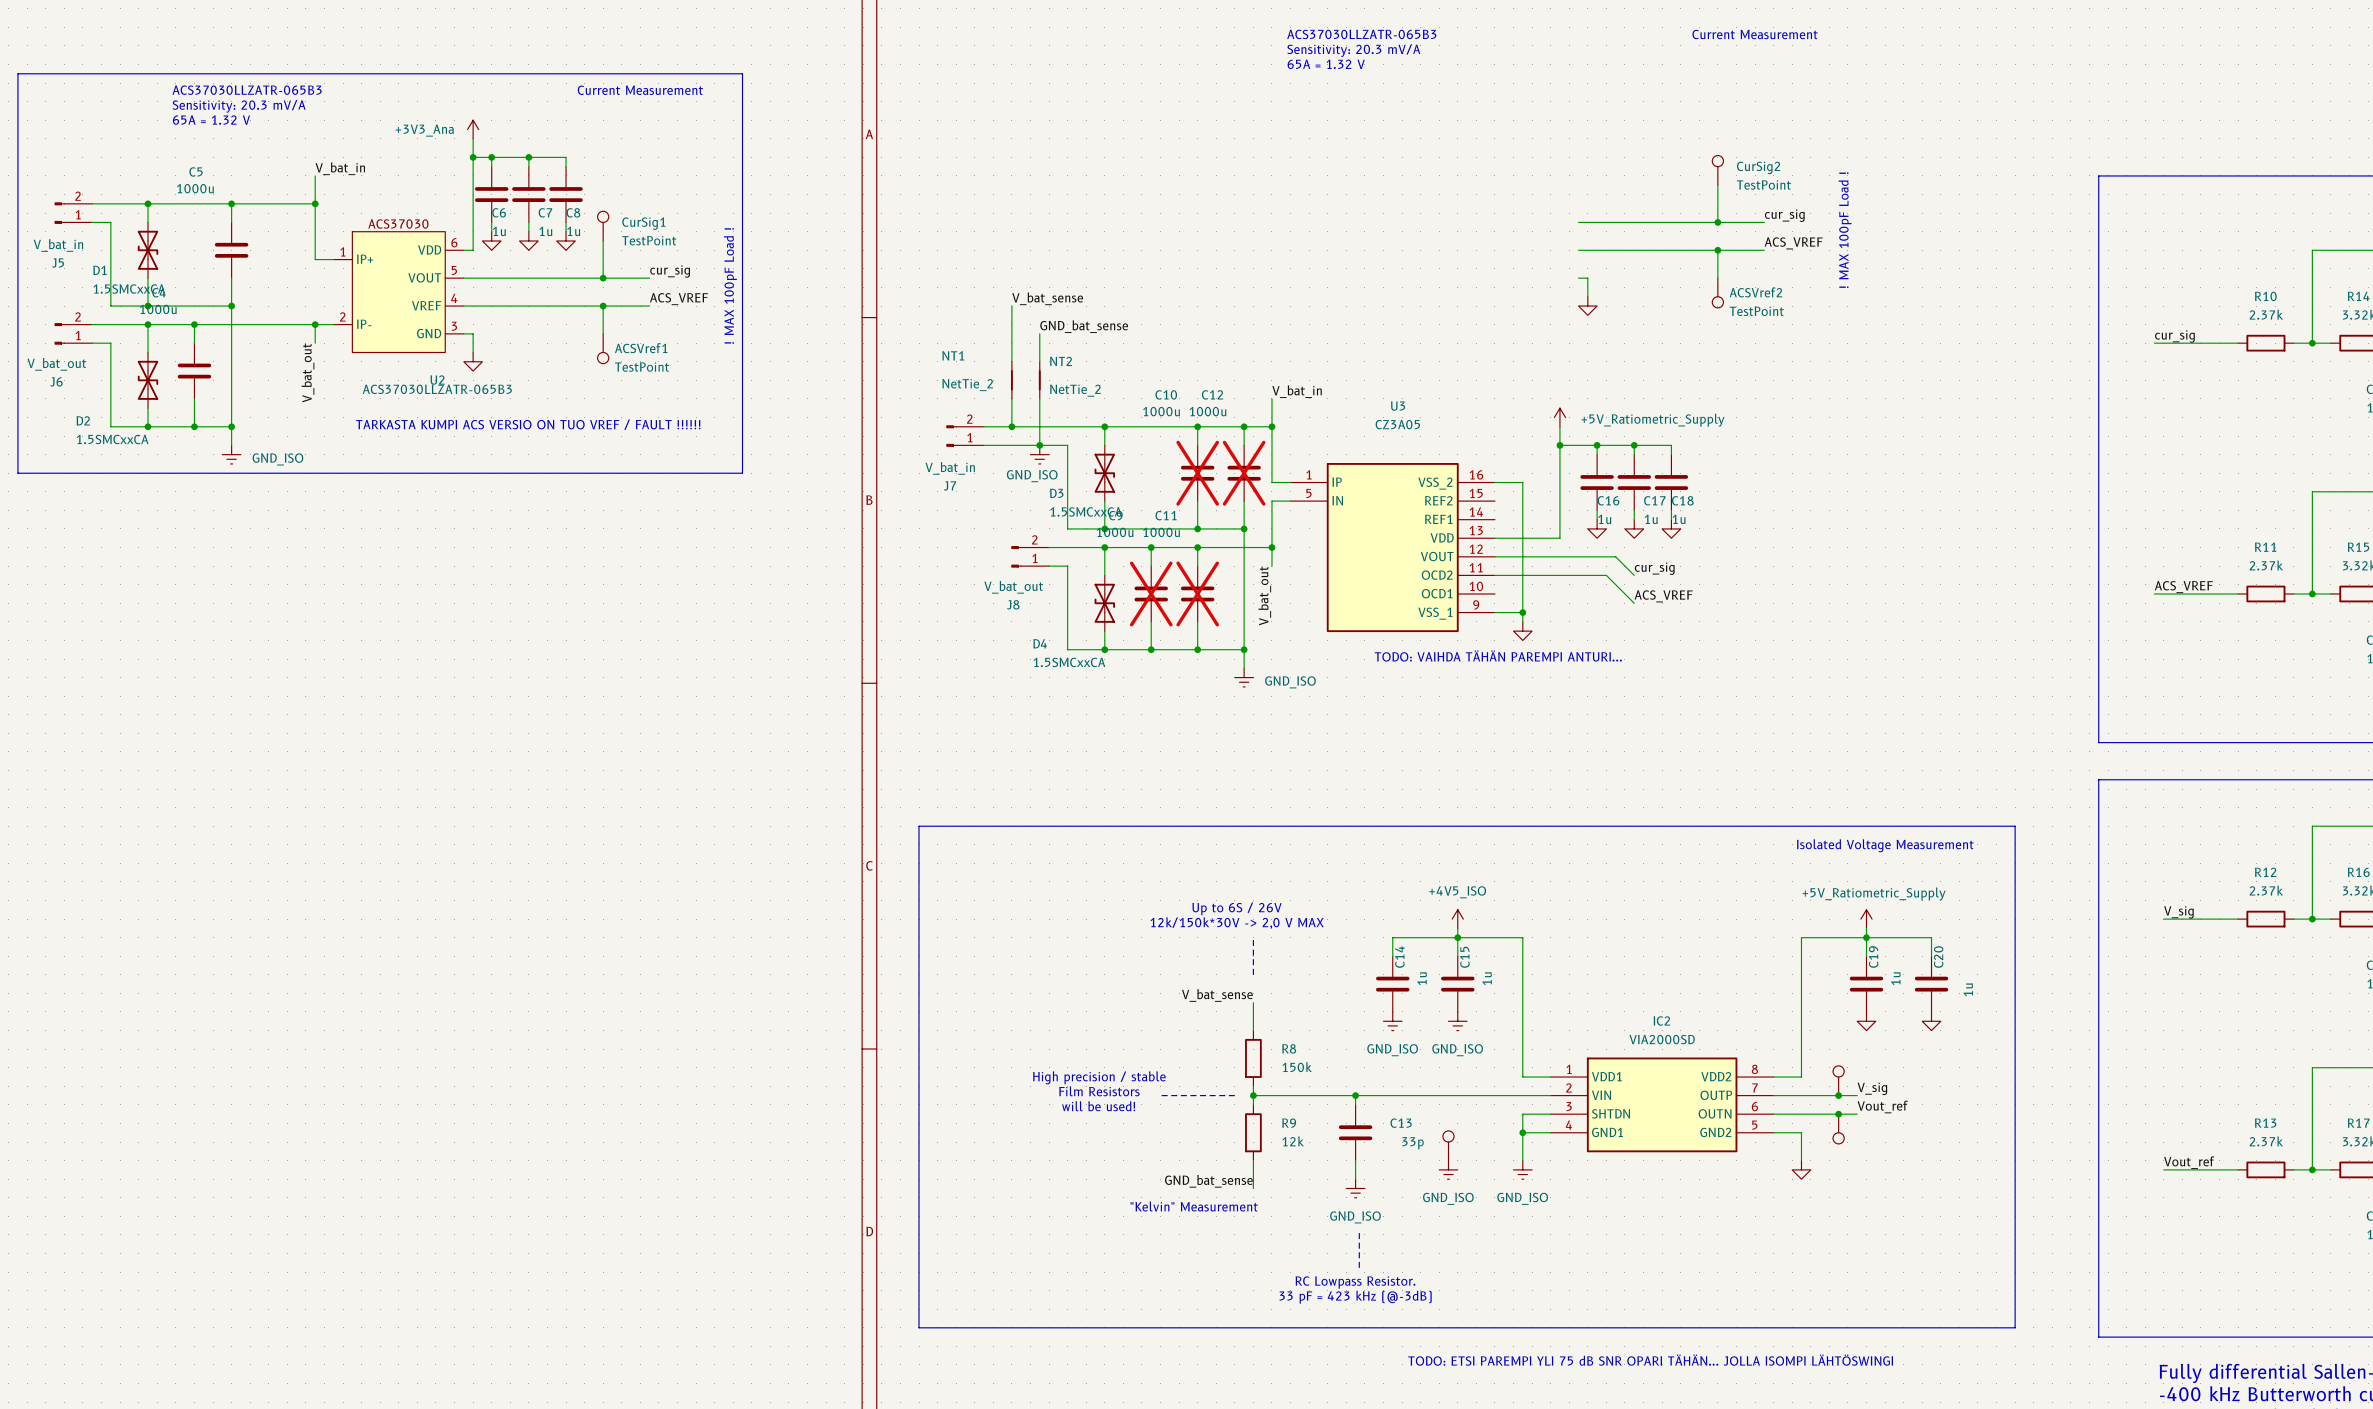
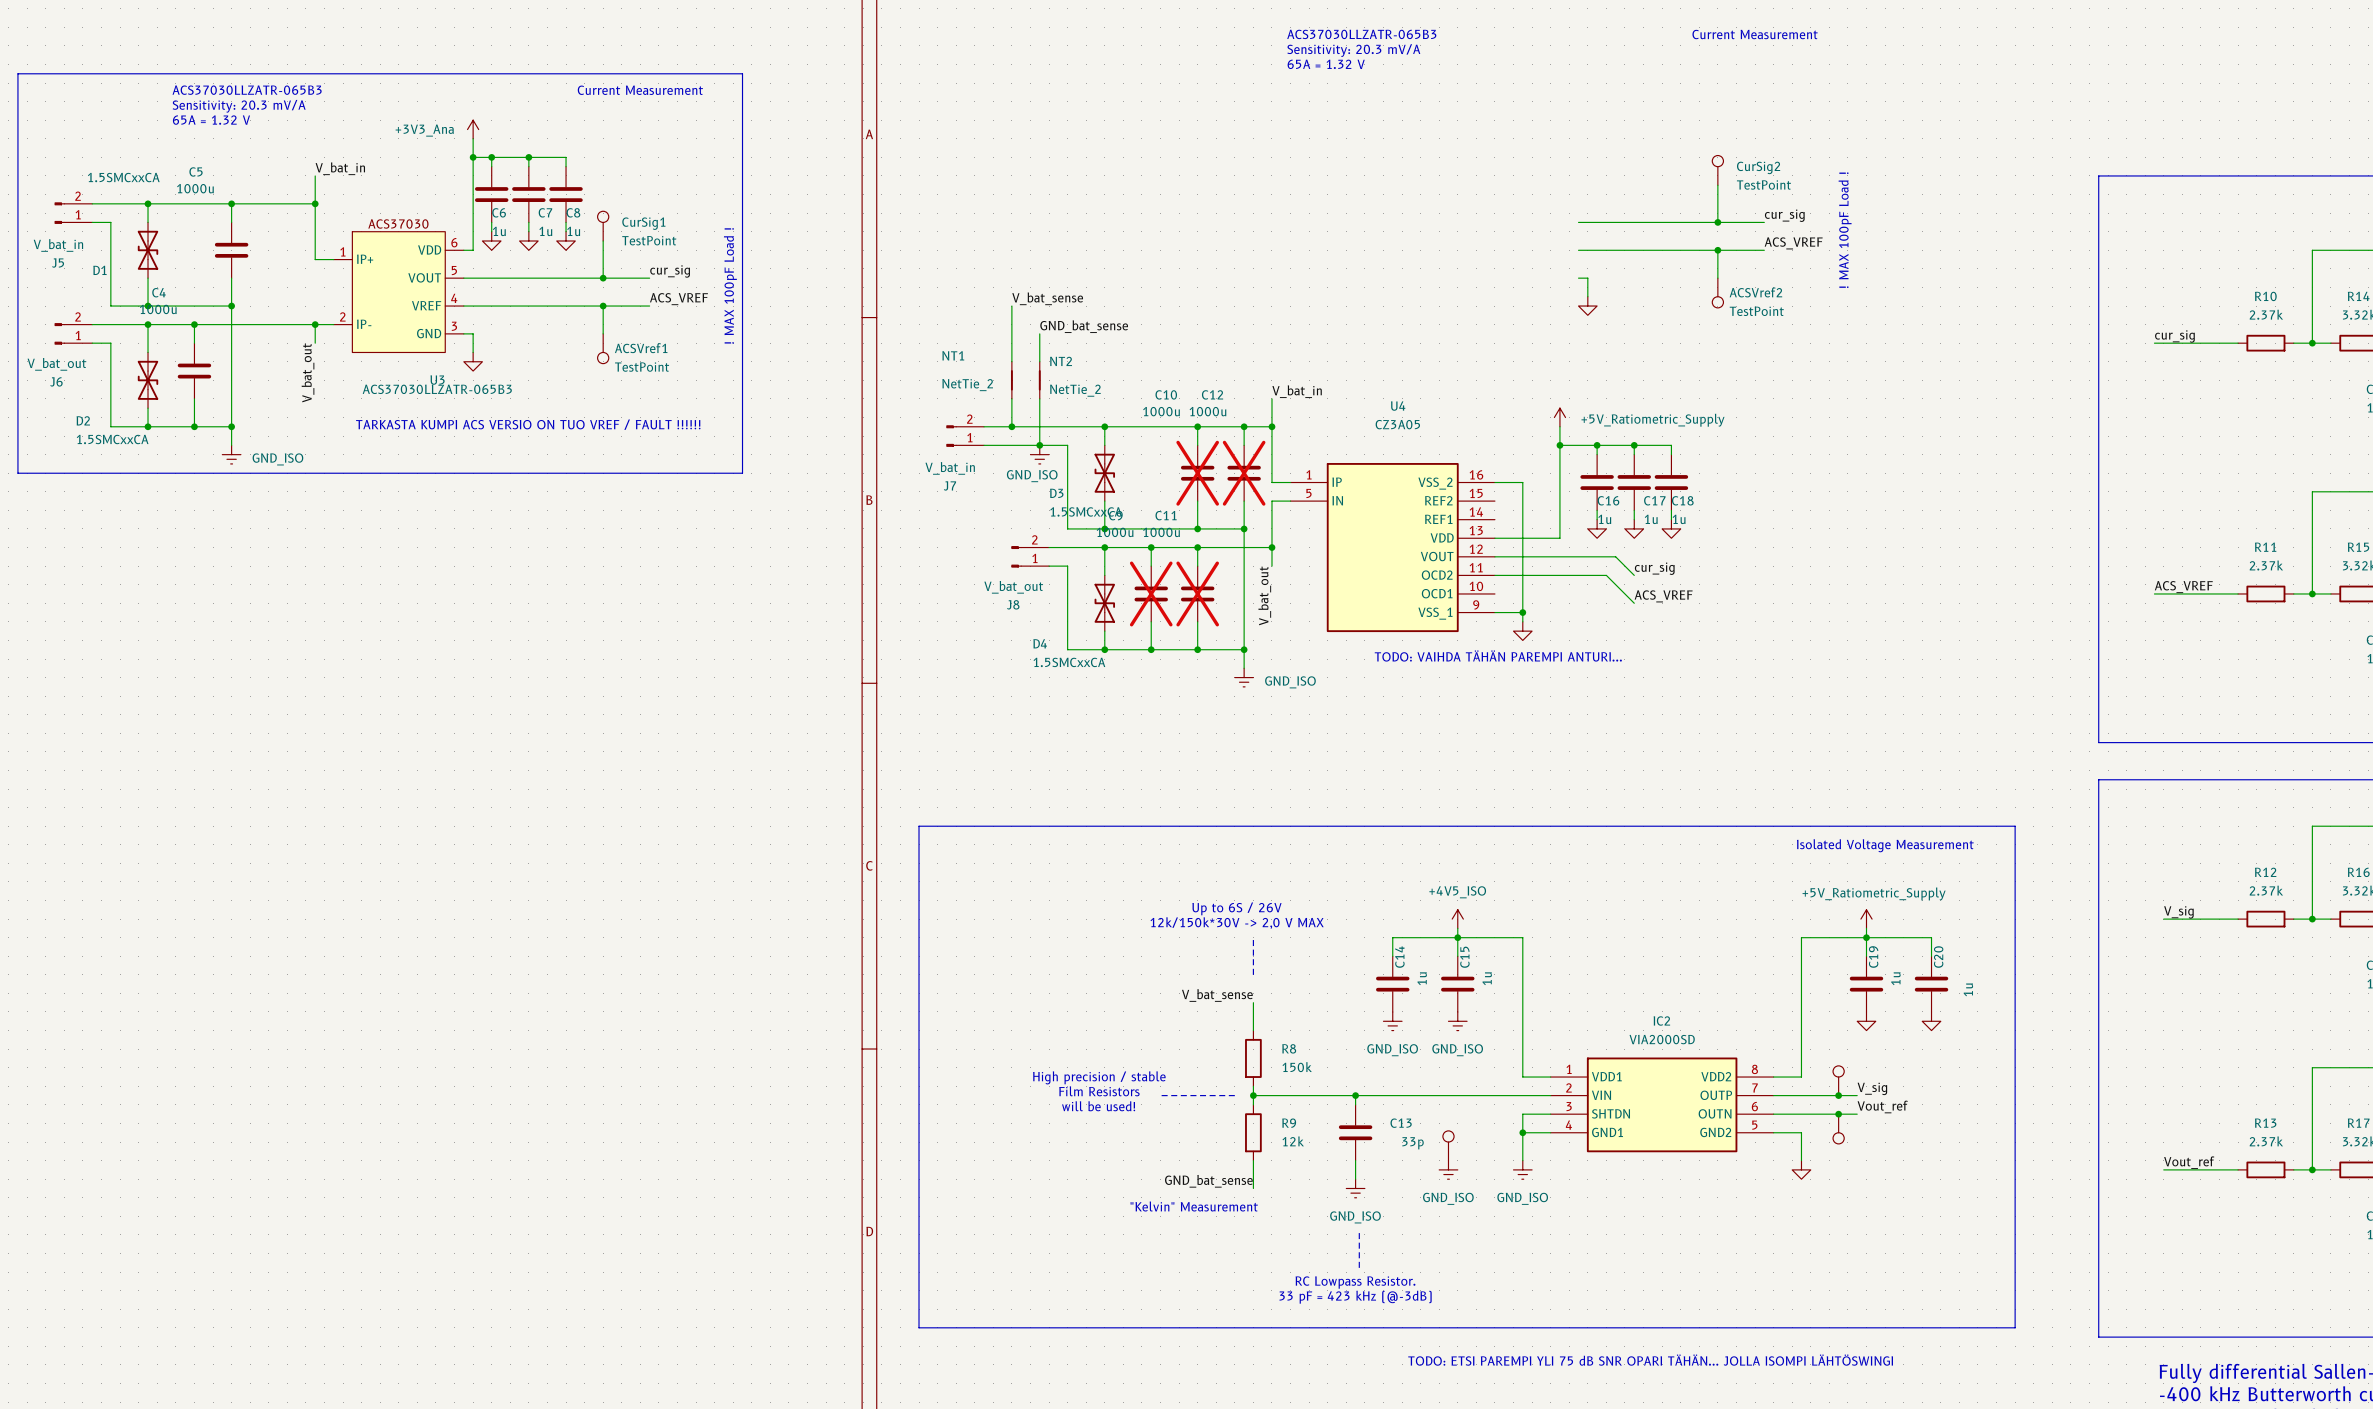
D1 value position: 1.5SMCxxCA (129, 289) -> 1.5SMCxxCA (123, 177)
U2 name: U2 (437, 380) -> U3 (437, 380)
U3 name: U3 (1398, 406) -> U4 (1398, 406)

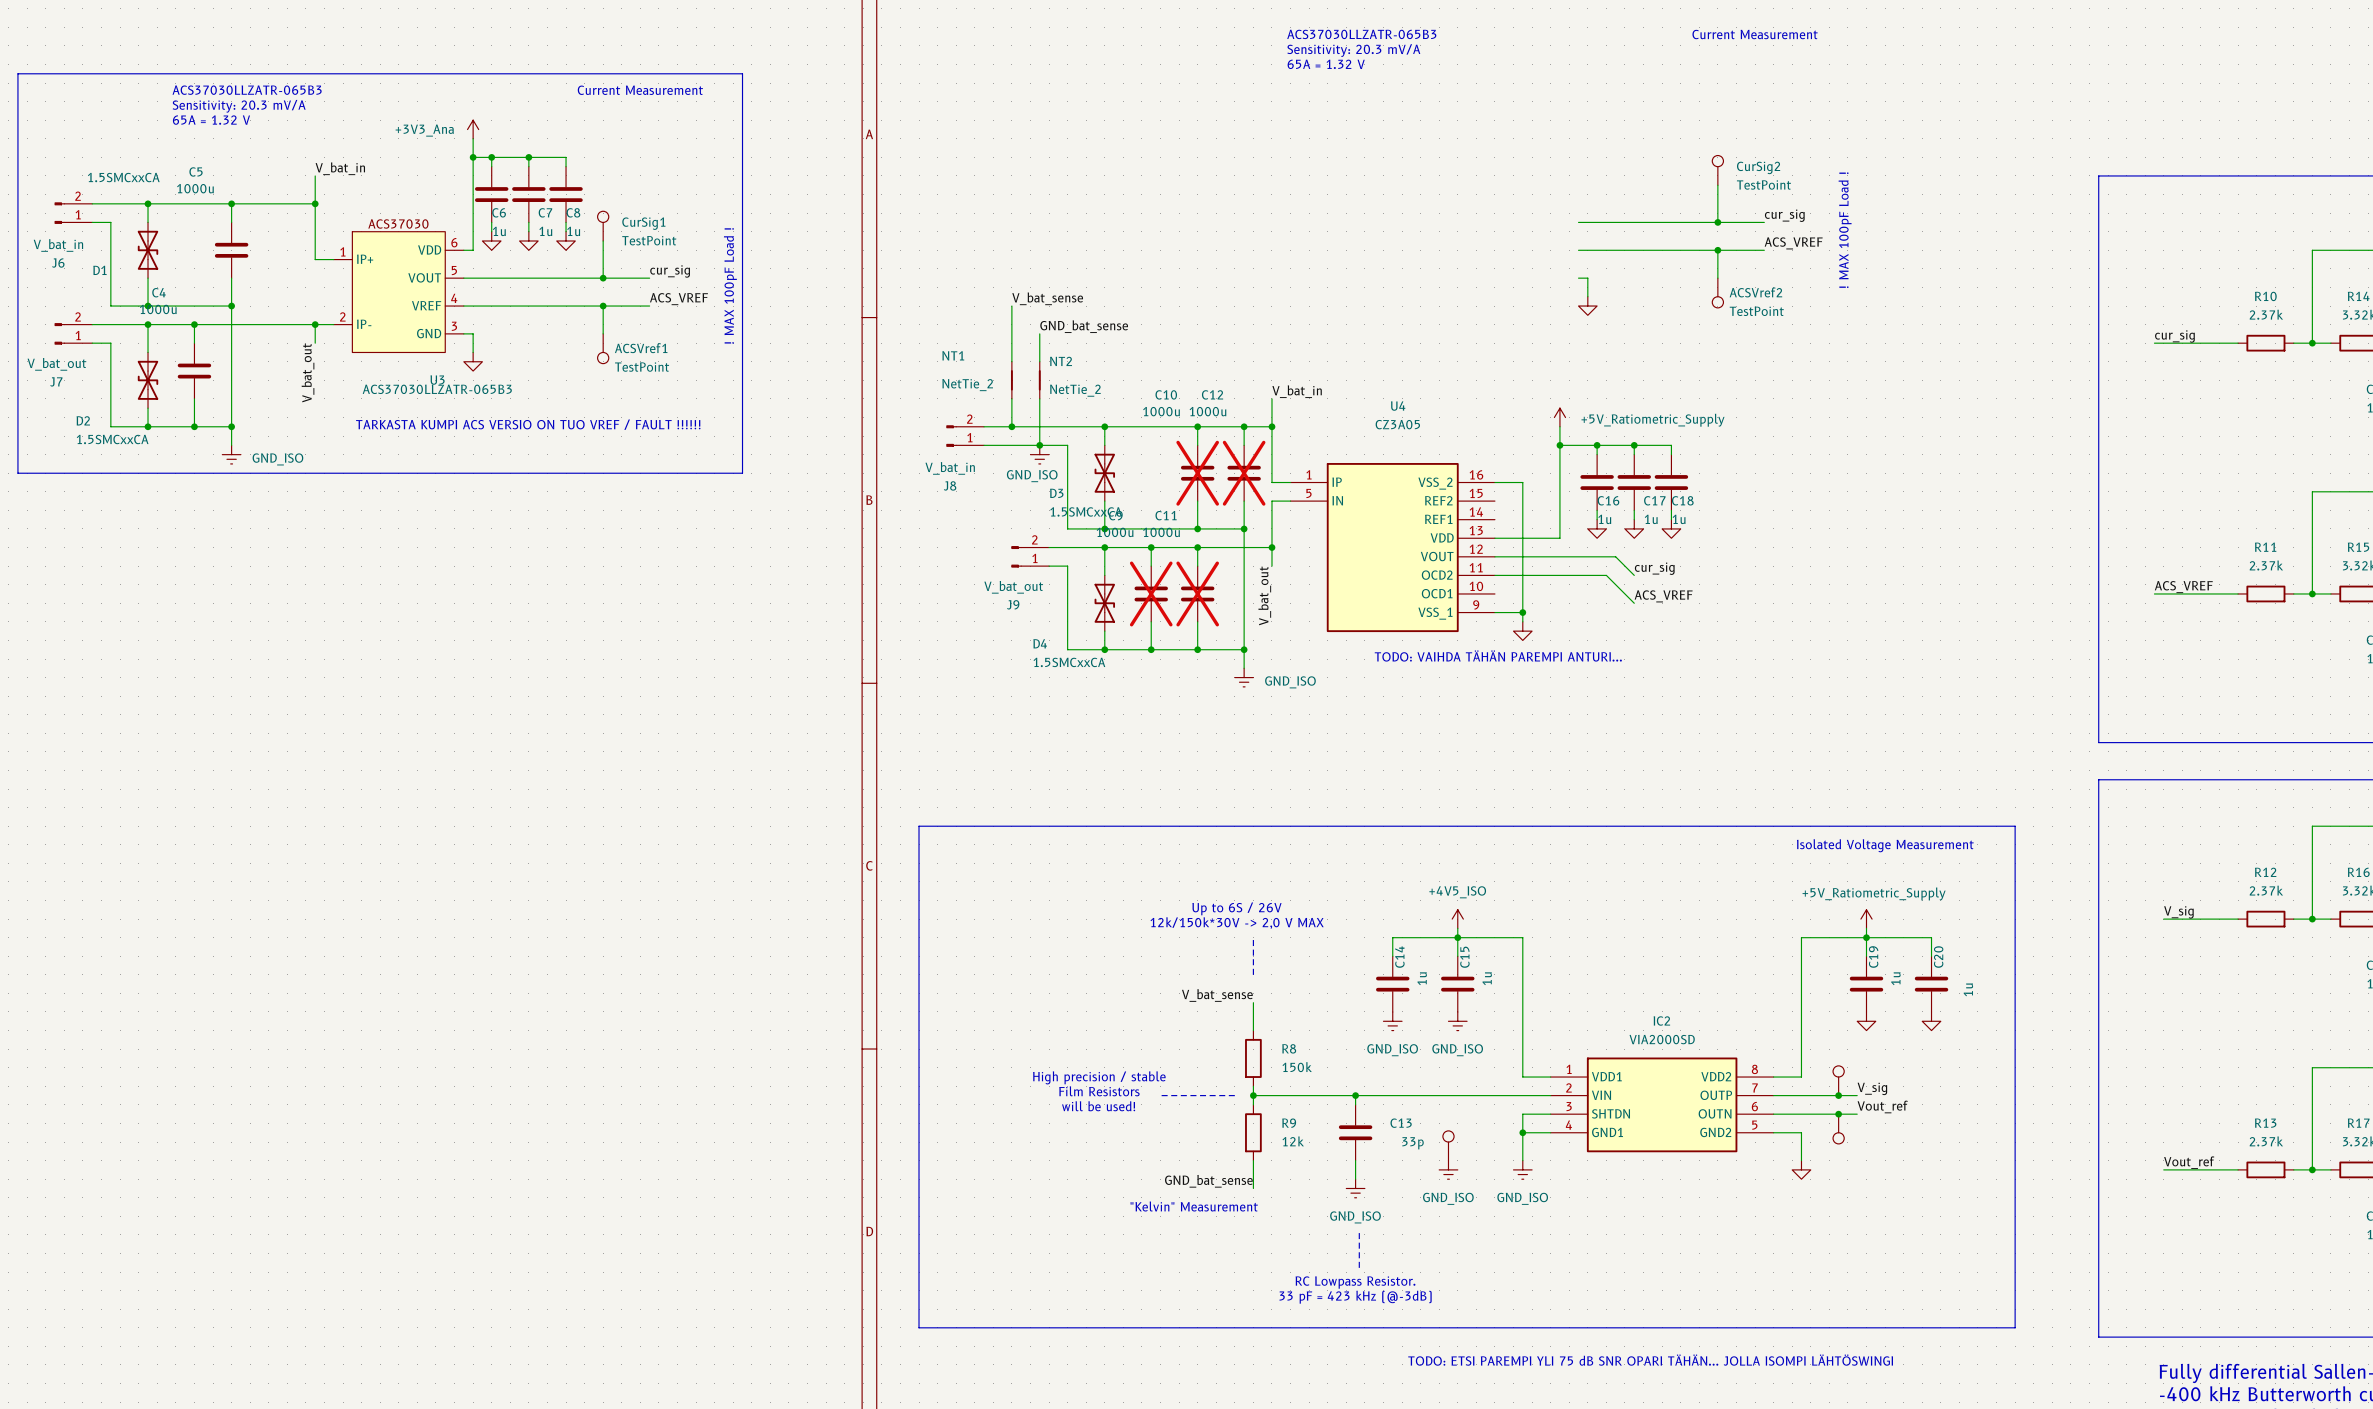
J5 name: J5 (58, 262) -> J6 (58, 262)
J6 name: J6 (56, 381) -> J7 (56, 381)
J7 name: J7 (949, 485) -> J8 (950, 485)
J8 name: J8 (1013, 604) -> J9 (1013, 604)

